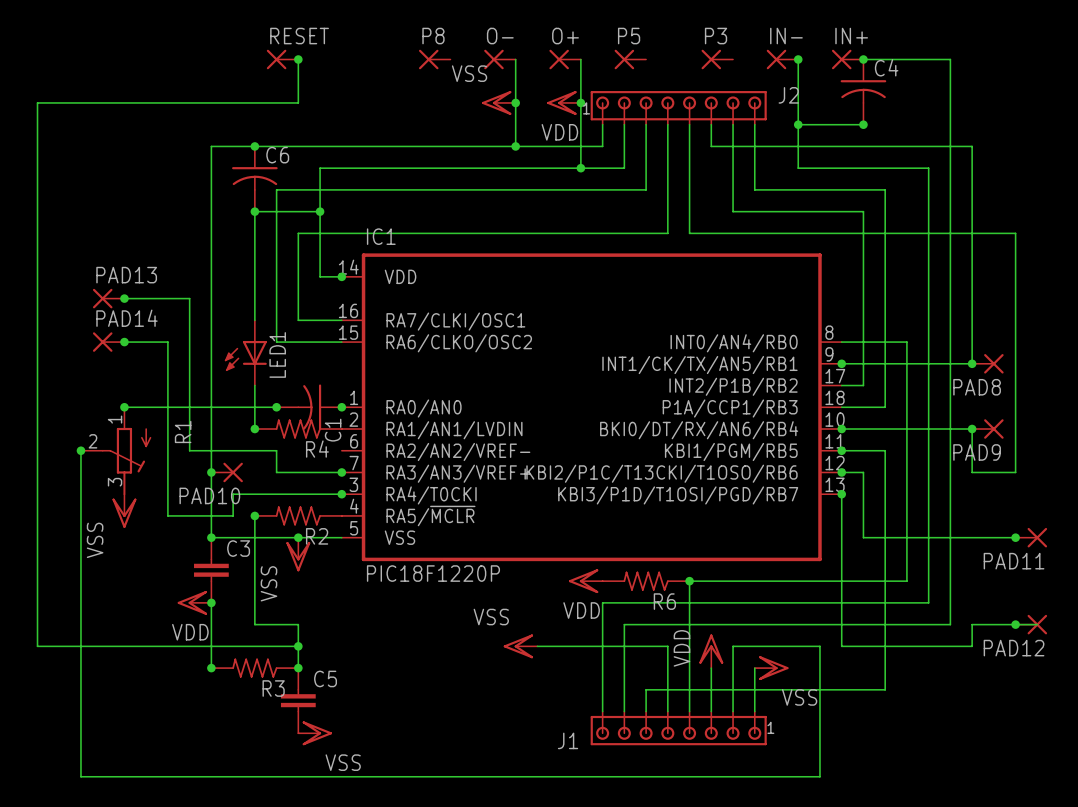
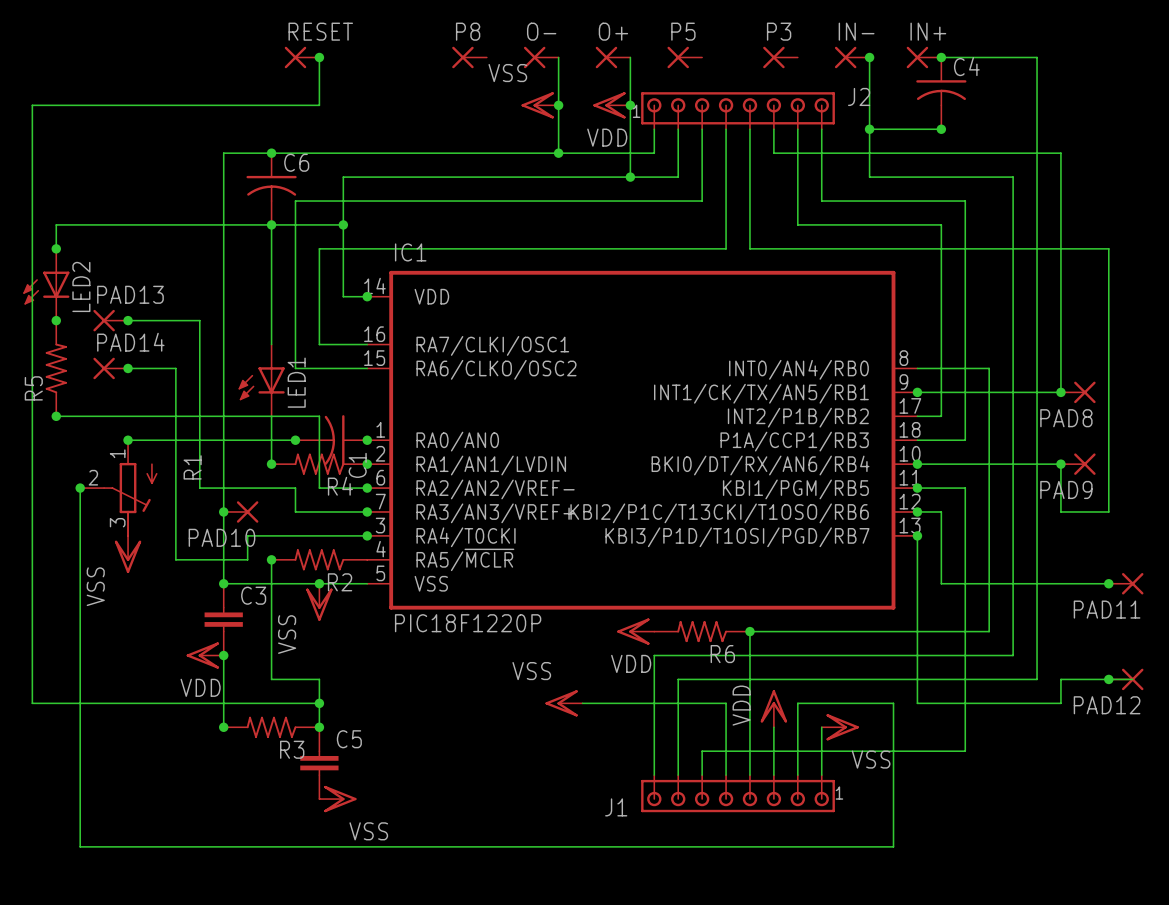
wire: none -> (271, 224) (56, 224) (56, 248)
junction: none -> (56, 248)
LED2: none -> (46, 284)
junction: none -> (56, 320)
R5: none -> (56, 368)
wire: none -> (56, 416) (319, 416) (319, 488) (367, 488)
junction: none -> (56, 416)
junction: none -> (367, 464)
junction: none -> (367, 488)

